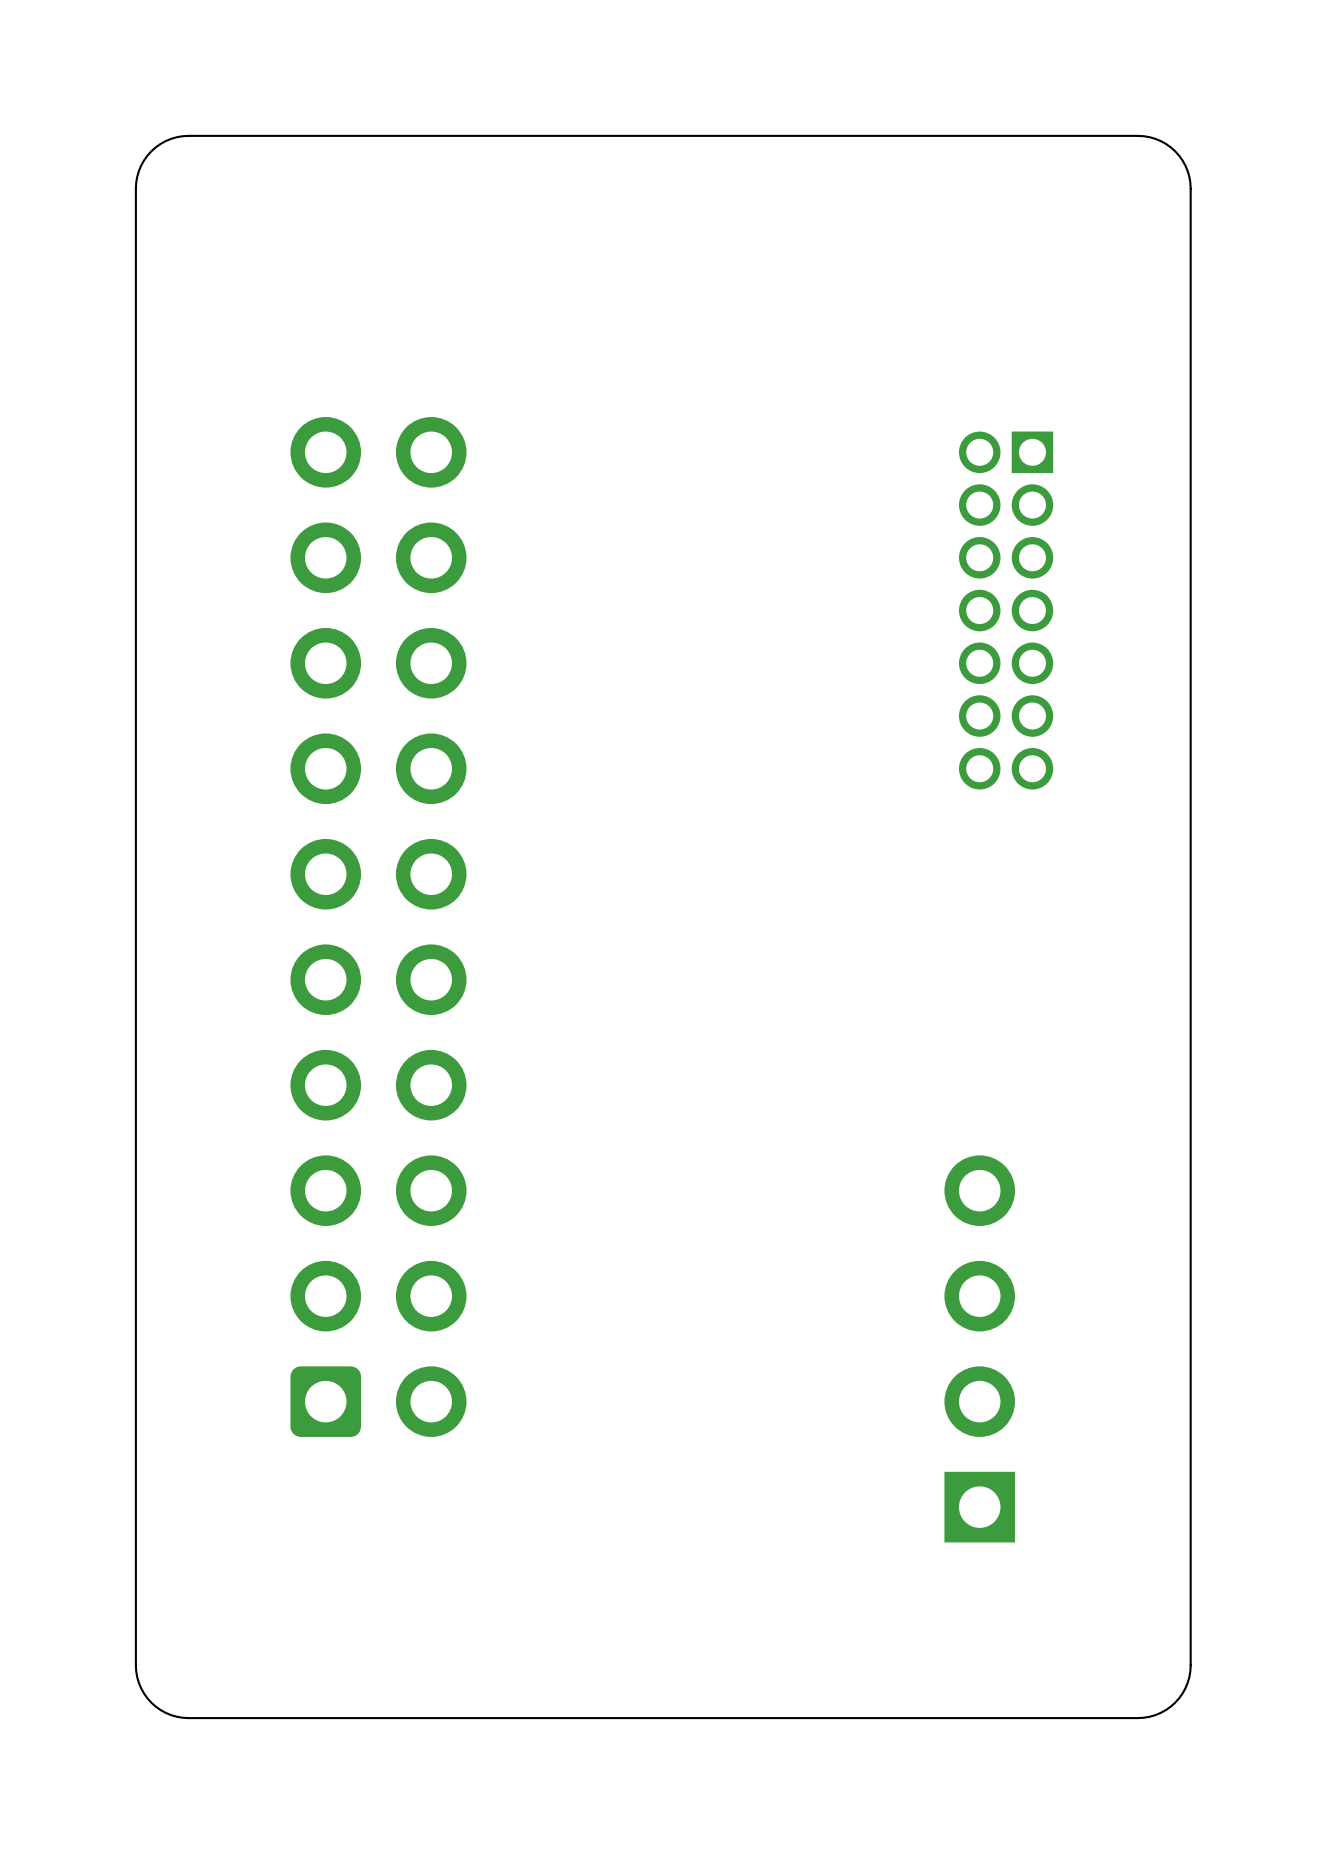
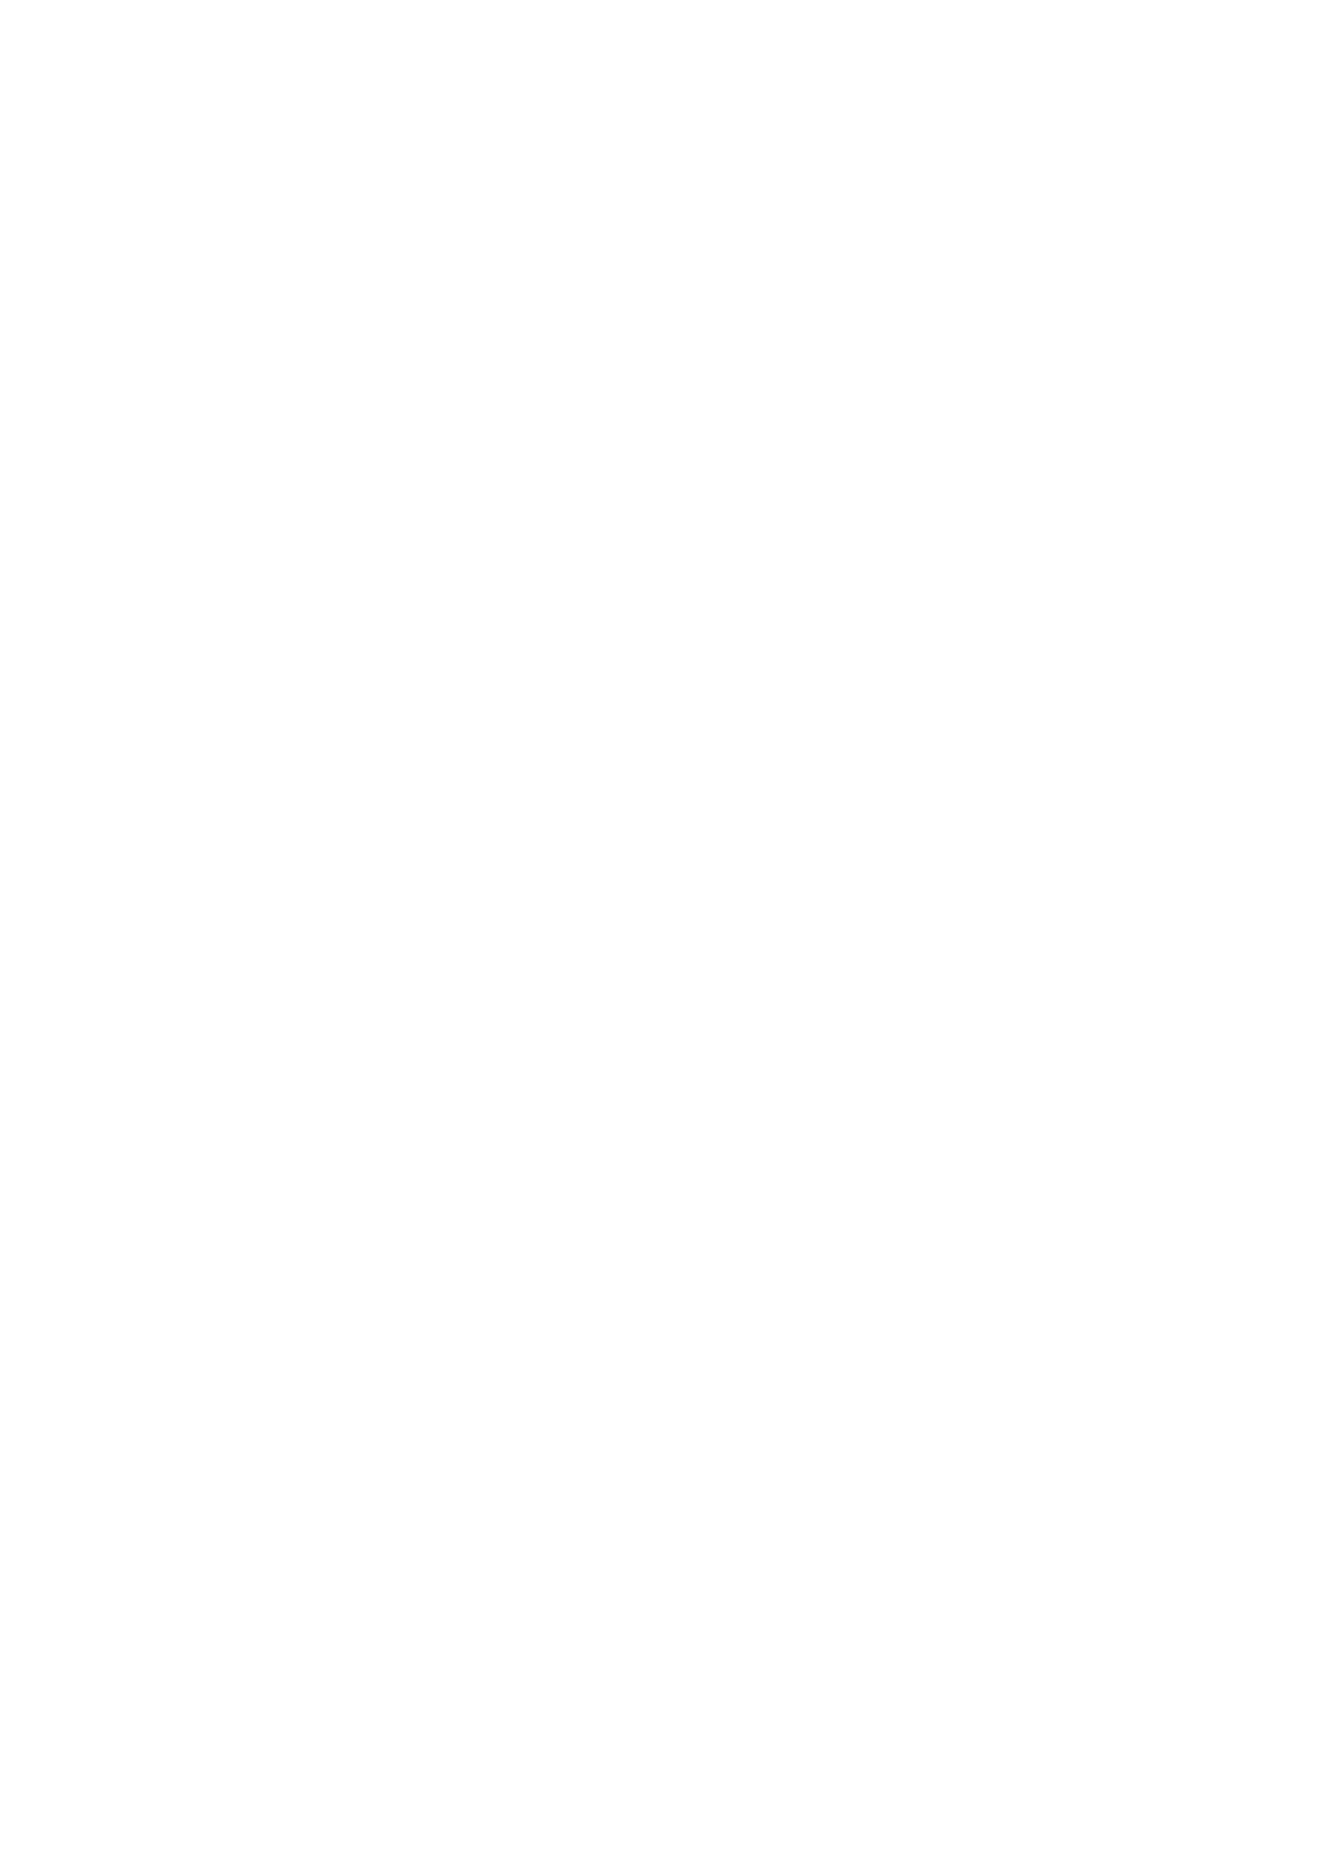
board edge: (1137, 135) (188, 135) (176, 137) (160, 143) (143, 160) (137, 176) (135, 188) (135, 1665) (141, 1688) (151, 1702) (160, 1710) (171, 1715) (188, 1718) (1137, 1718) (1160, 1712) (1170, 1706) (1182, 1693) (1187, 1682) (1190, 1665) (1190, 188) (1185, 165) (1175, 151) (1155, 138) (1137, 135) -> none
part: (1006, 610) -> none
part: (378, 926) -> none
part: (979, 1348) -> none

